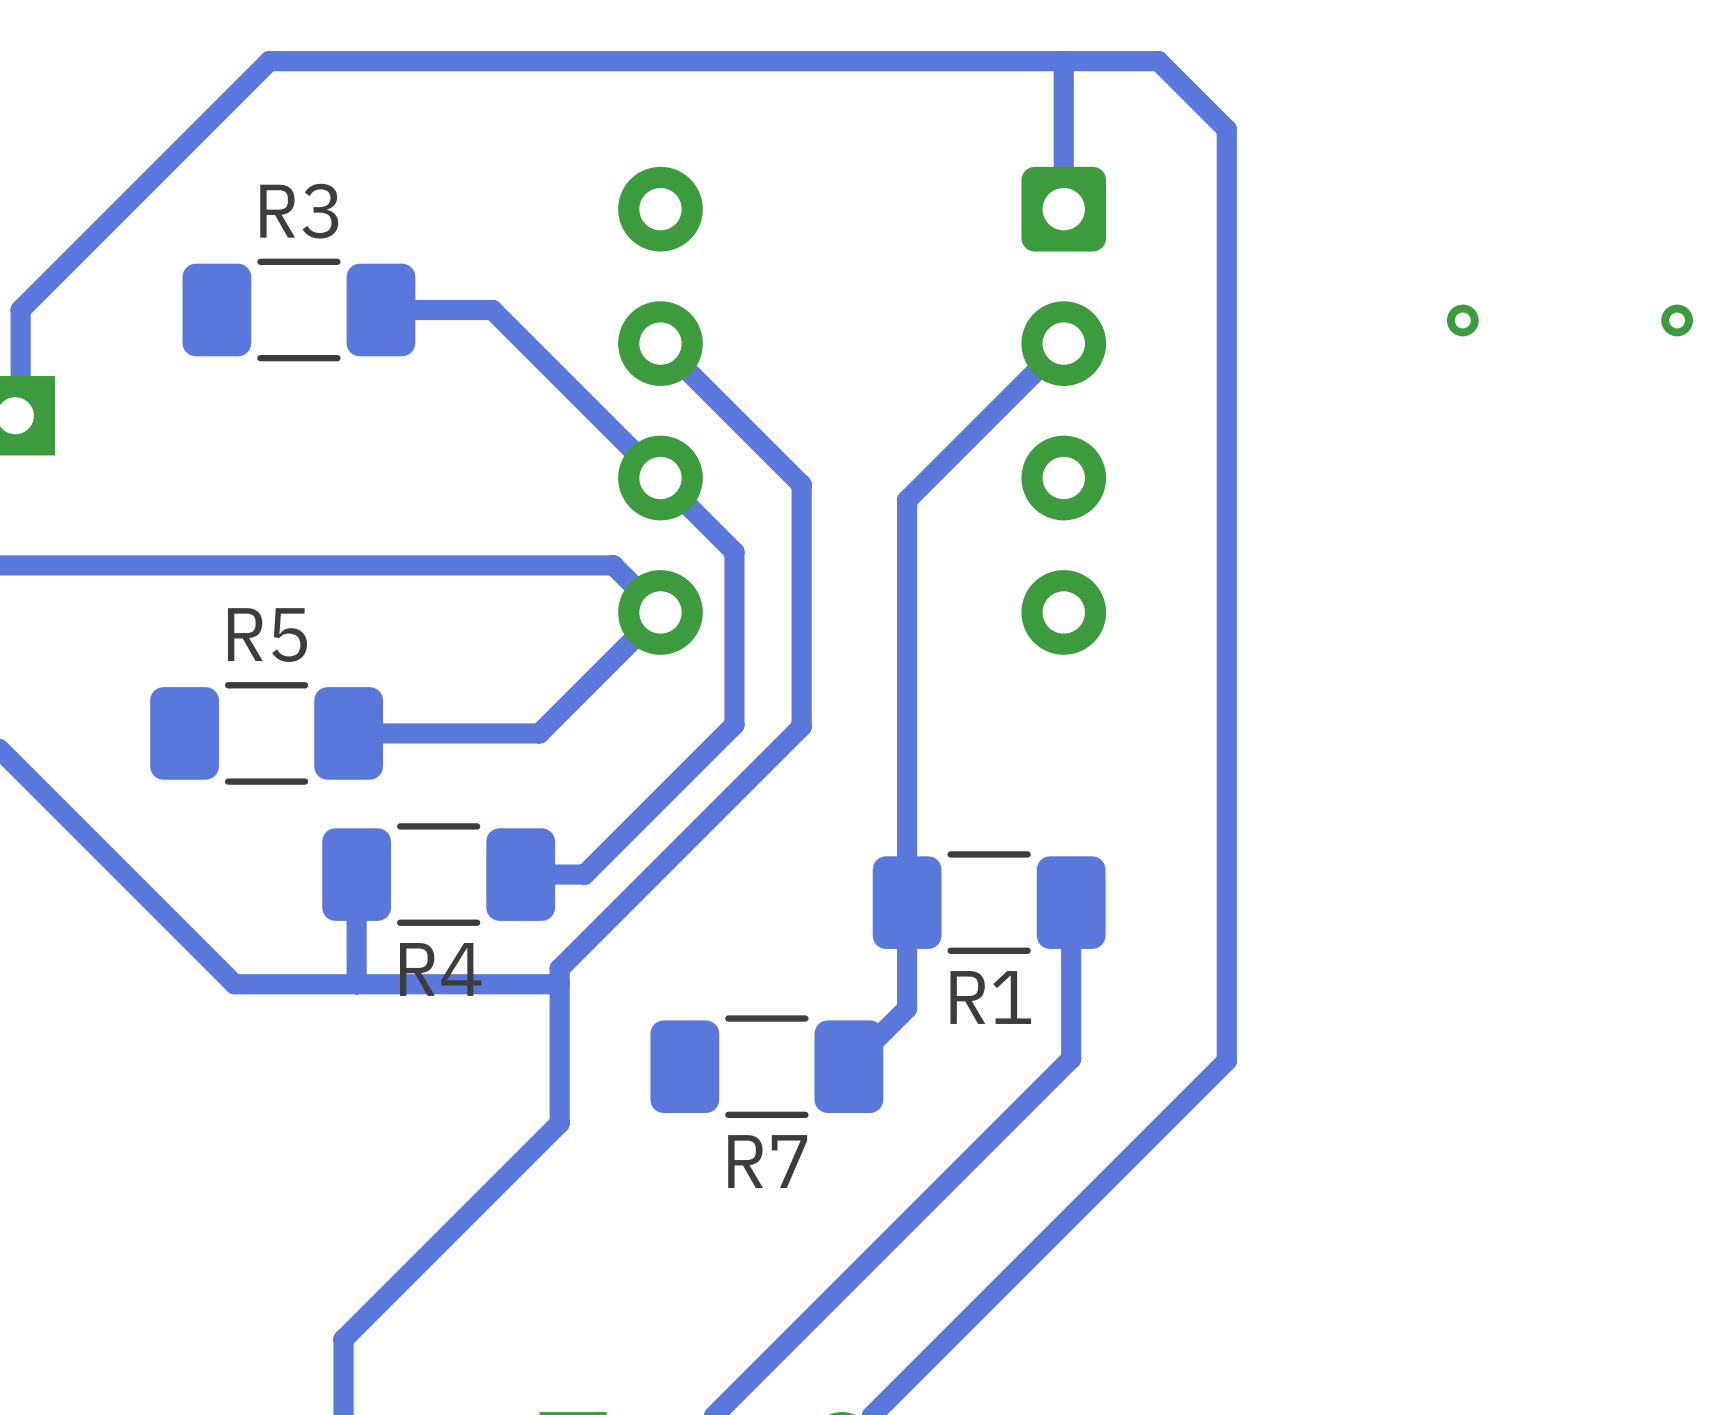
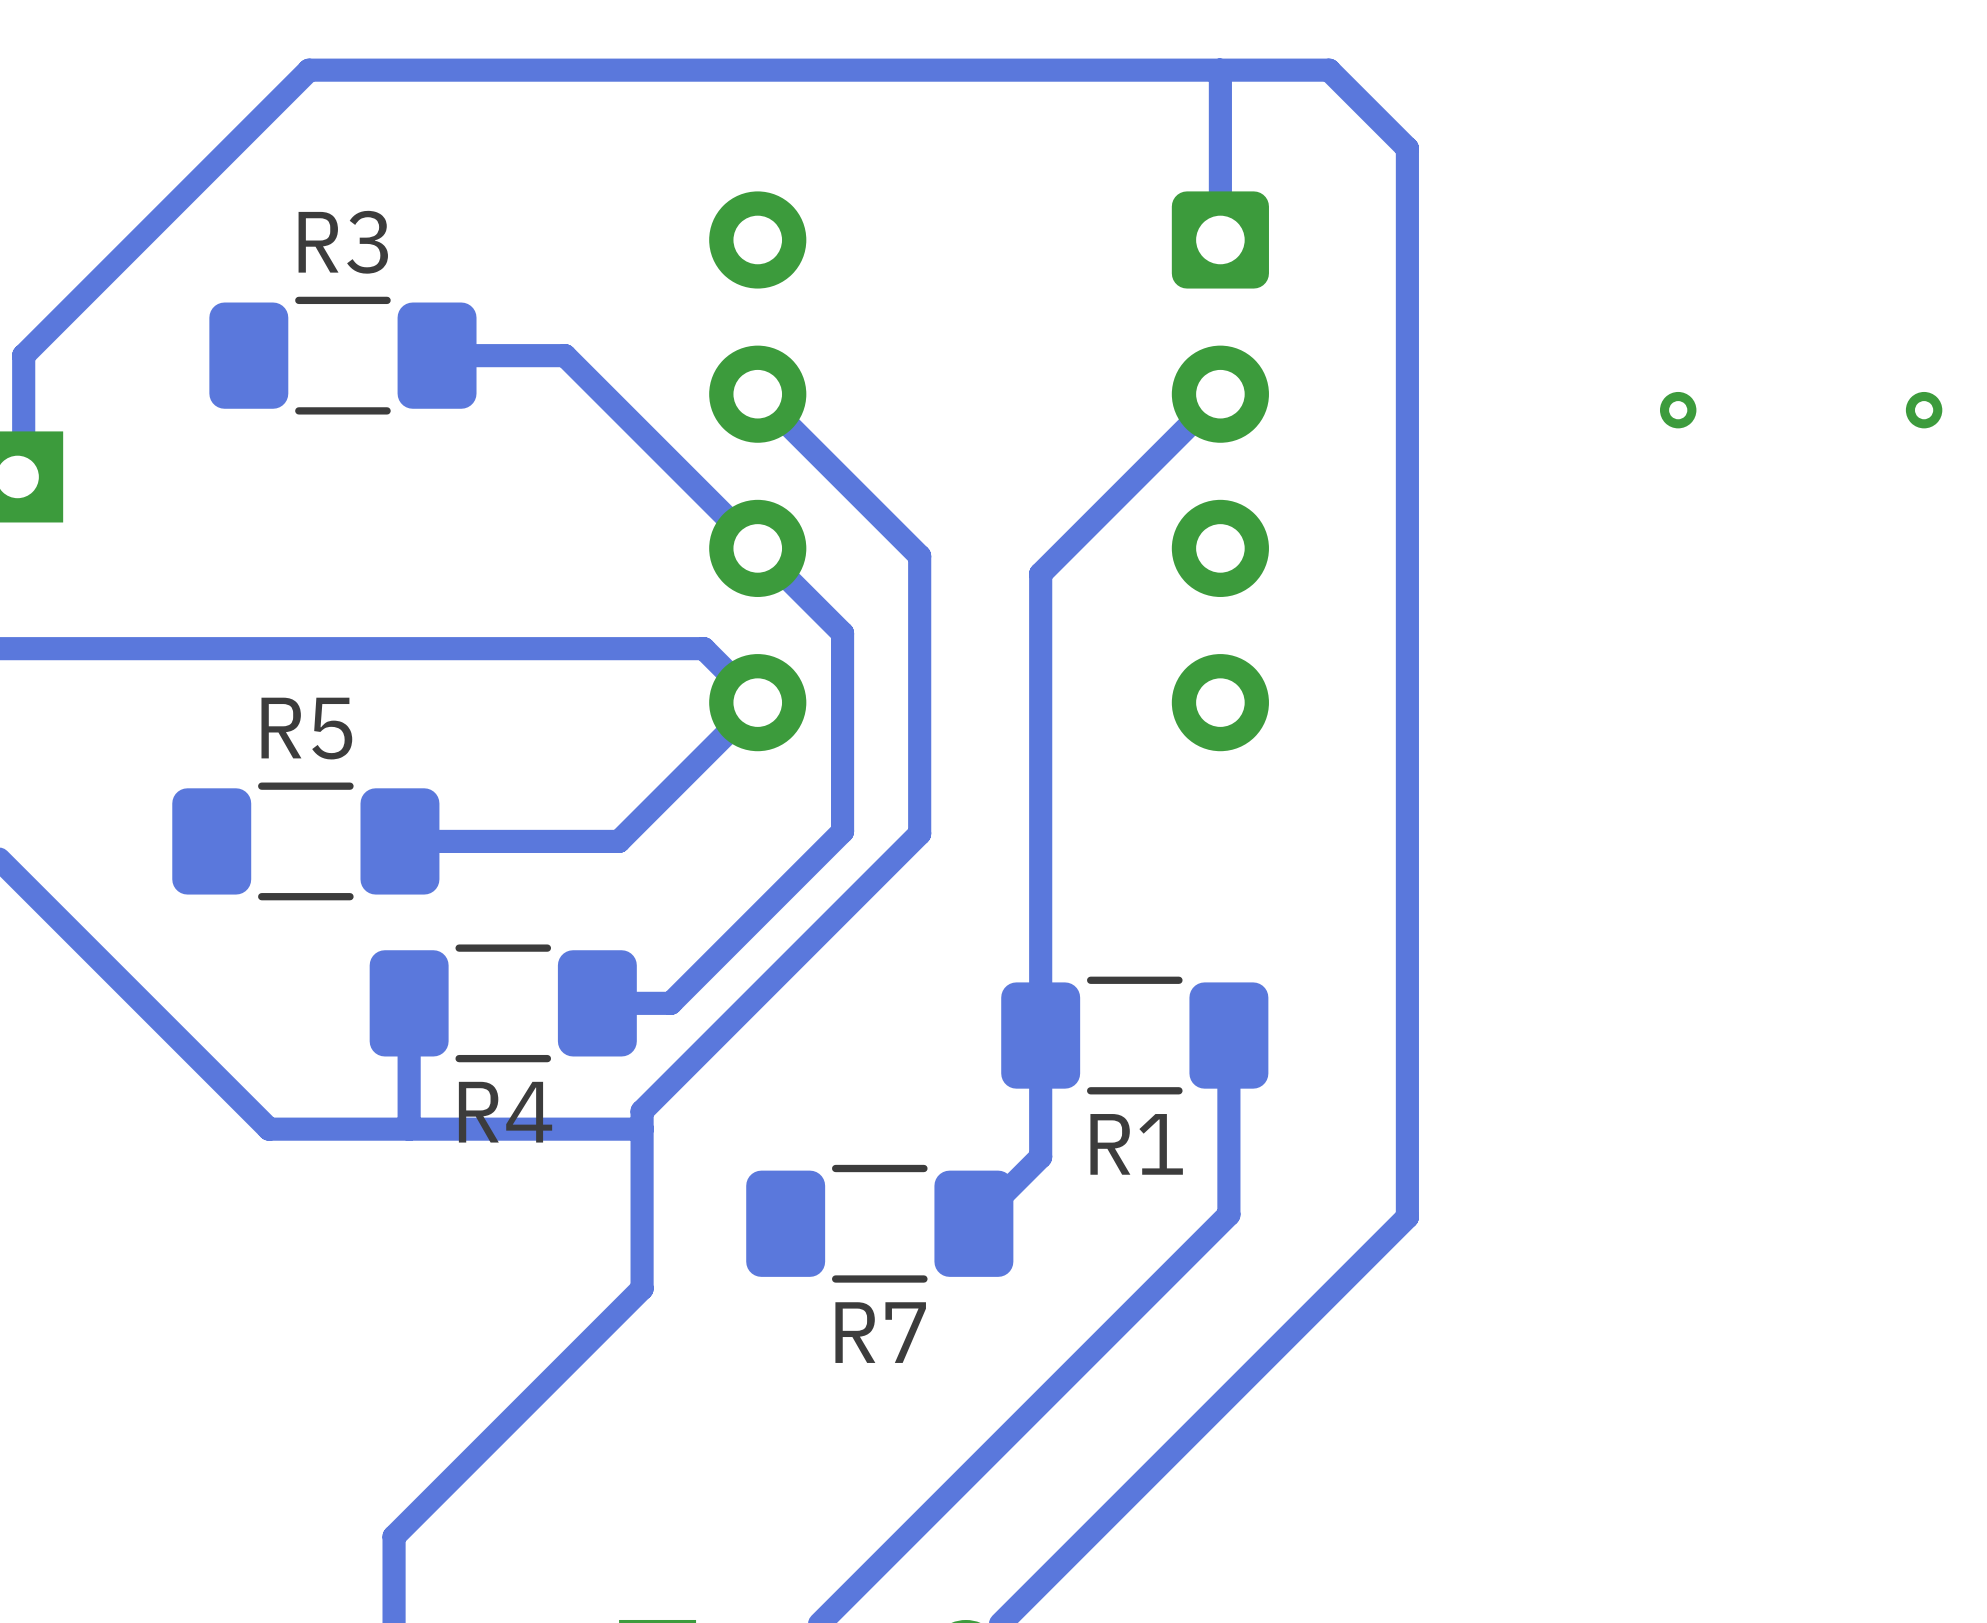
via position: (1462, 320) -> (1678, 410)
via position: (1677, 320) -> (1924, 410)

